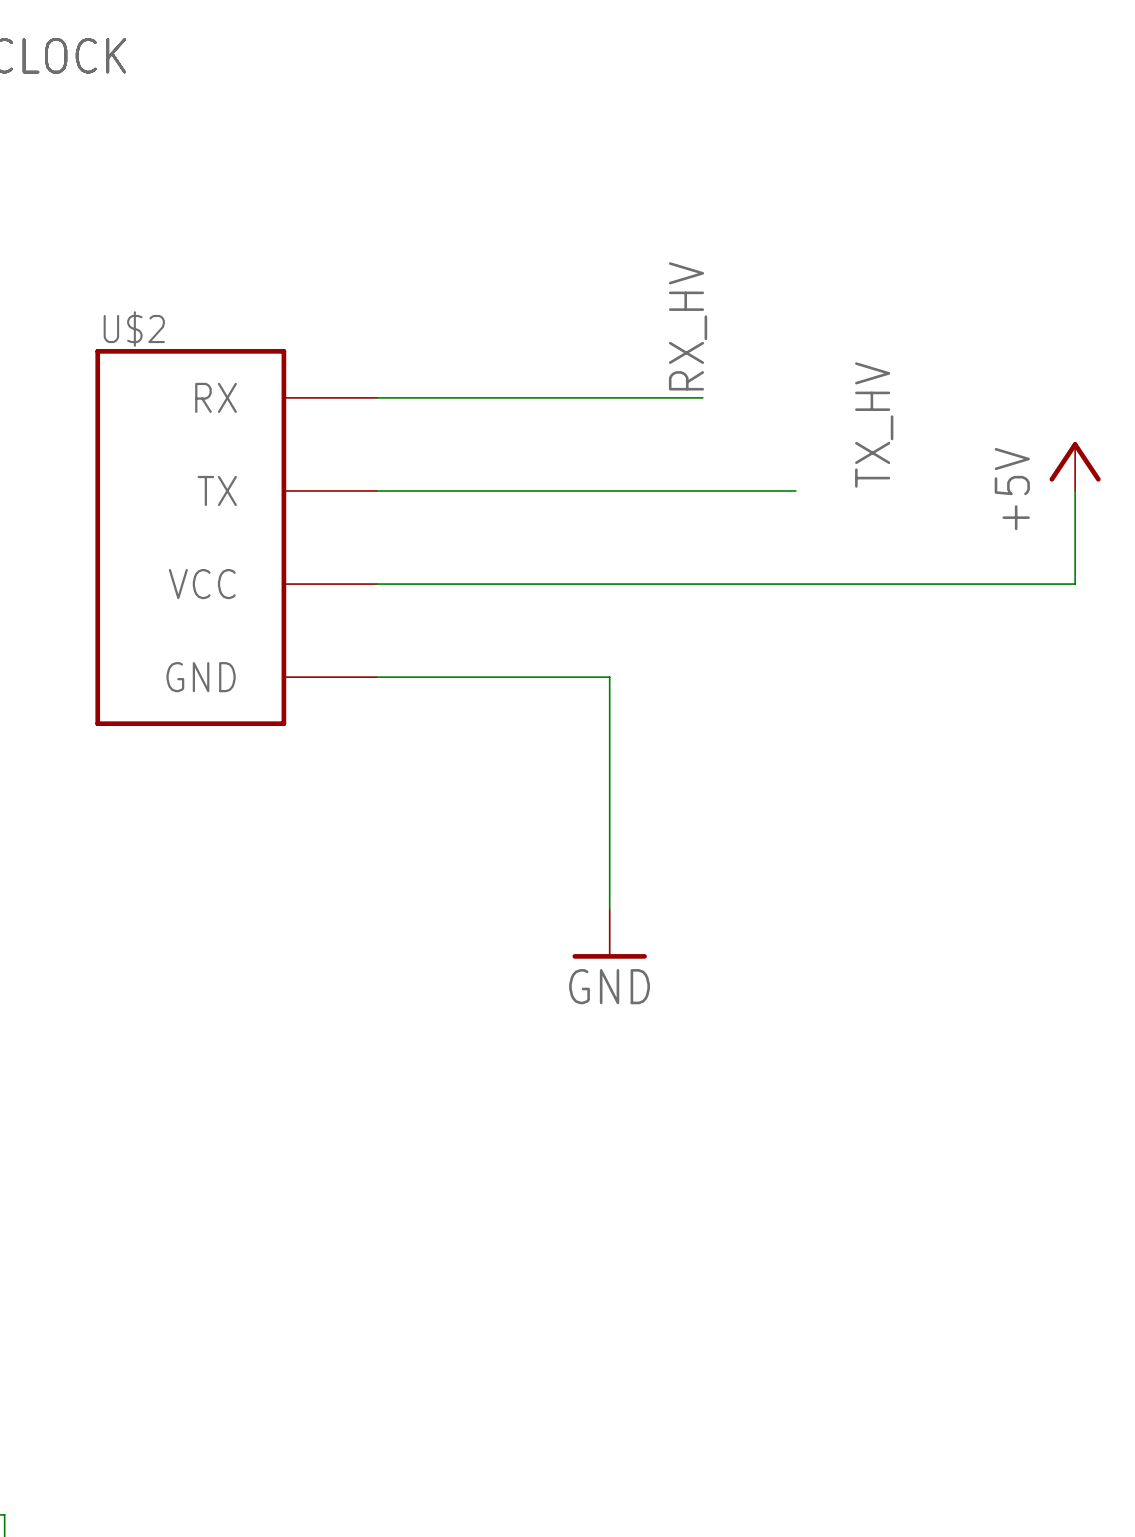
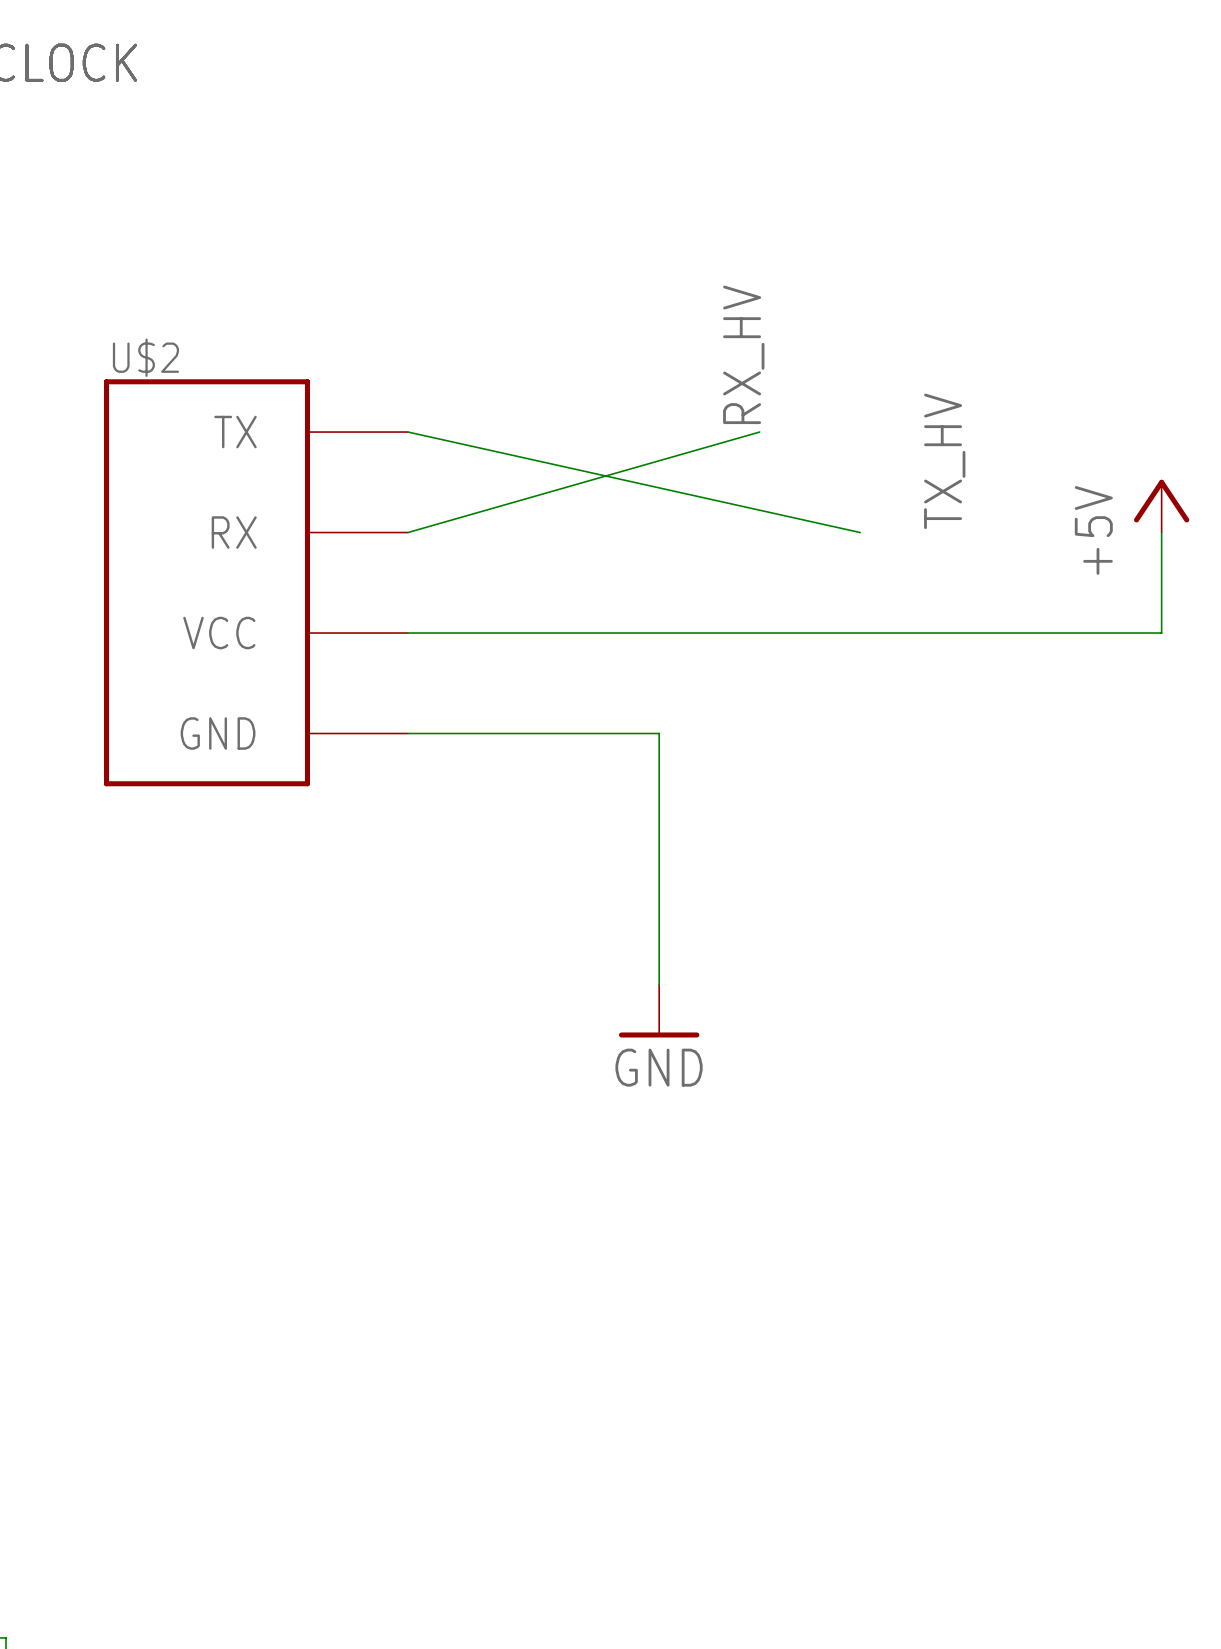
U$2 pin name: RX (216, 397) -> TX (235, 432)
wire: (376, 397) (702, 397) -> (407, 532) (759, 432)
U$2 pin name: TX (217, 490) -> RX (234, 532)
wire: (376, 490) (795, 490) -> (407, 432) (860, 532)

